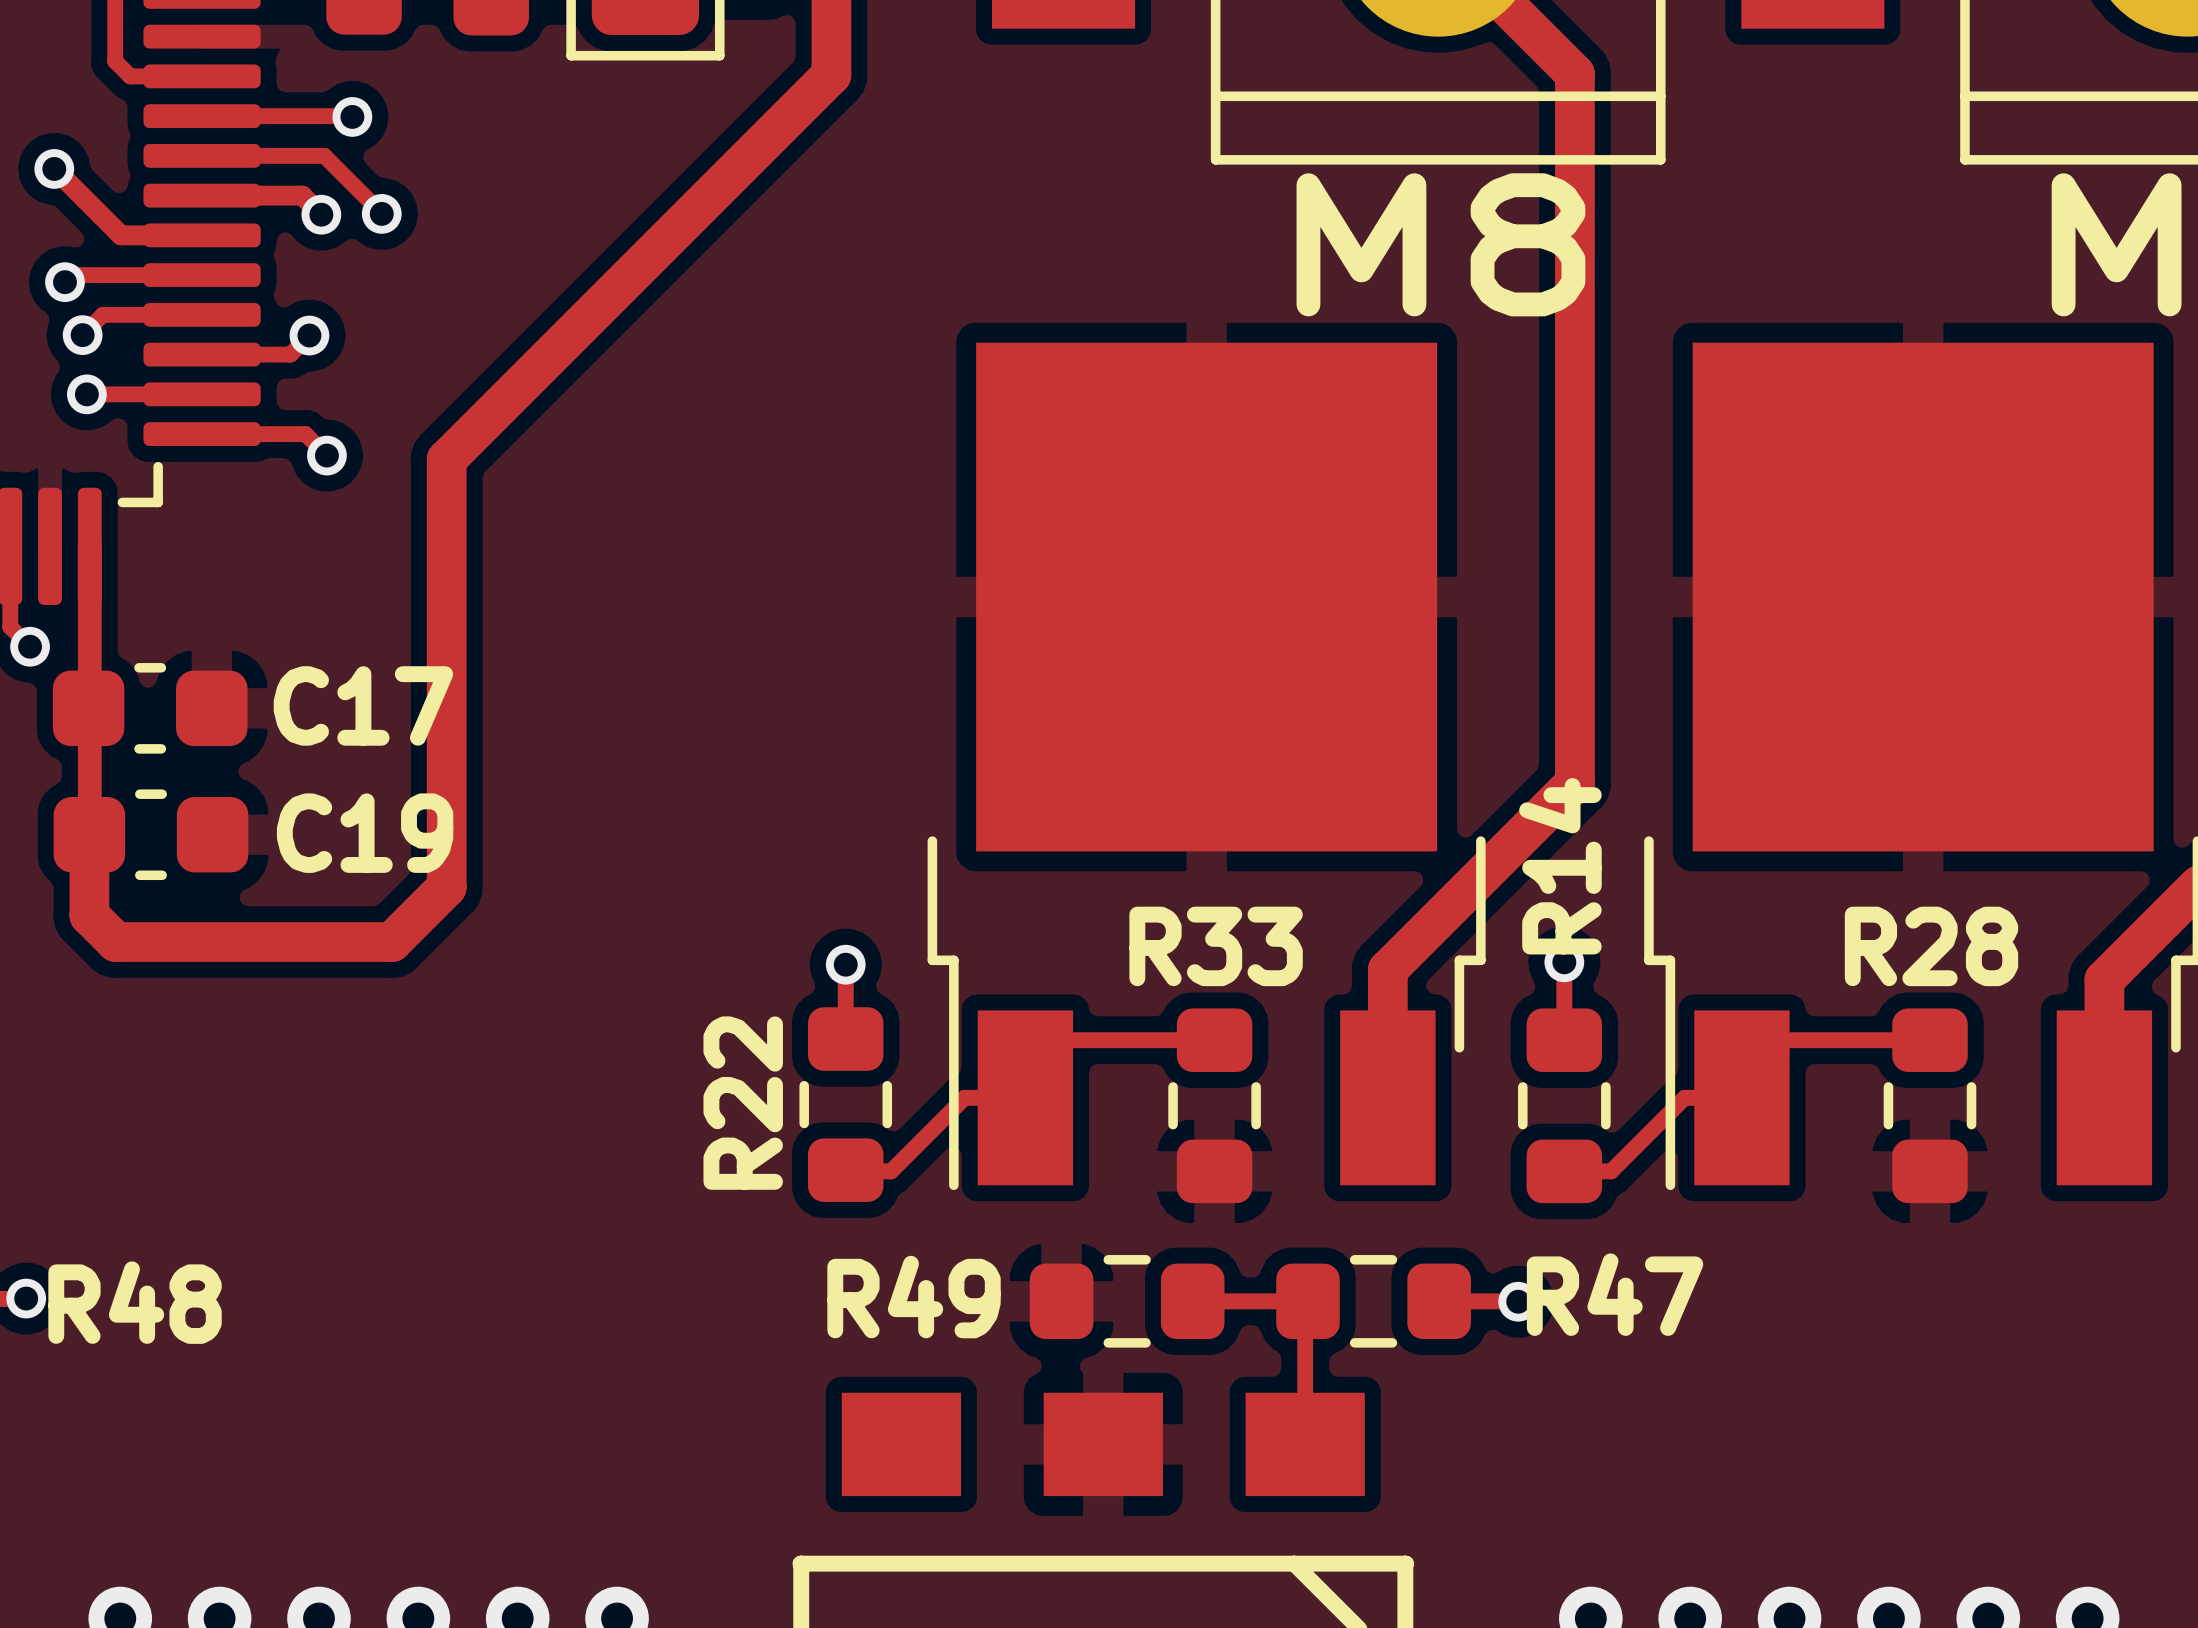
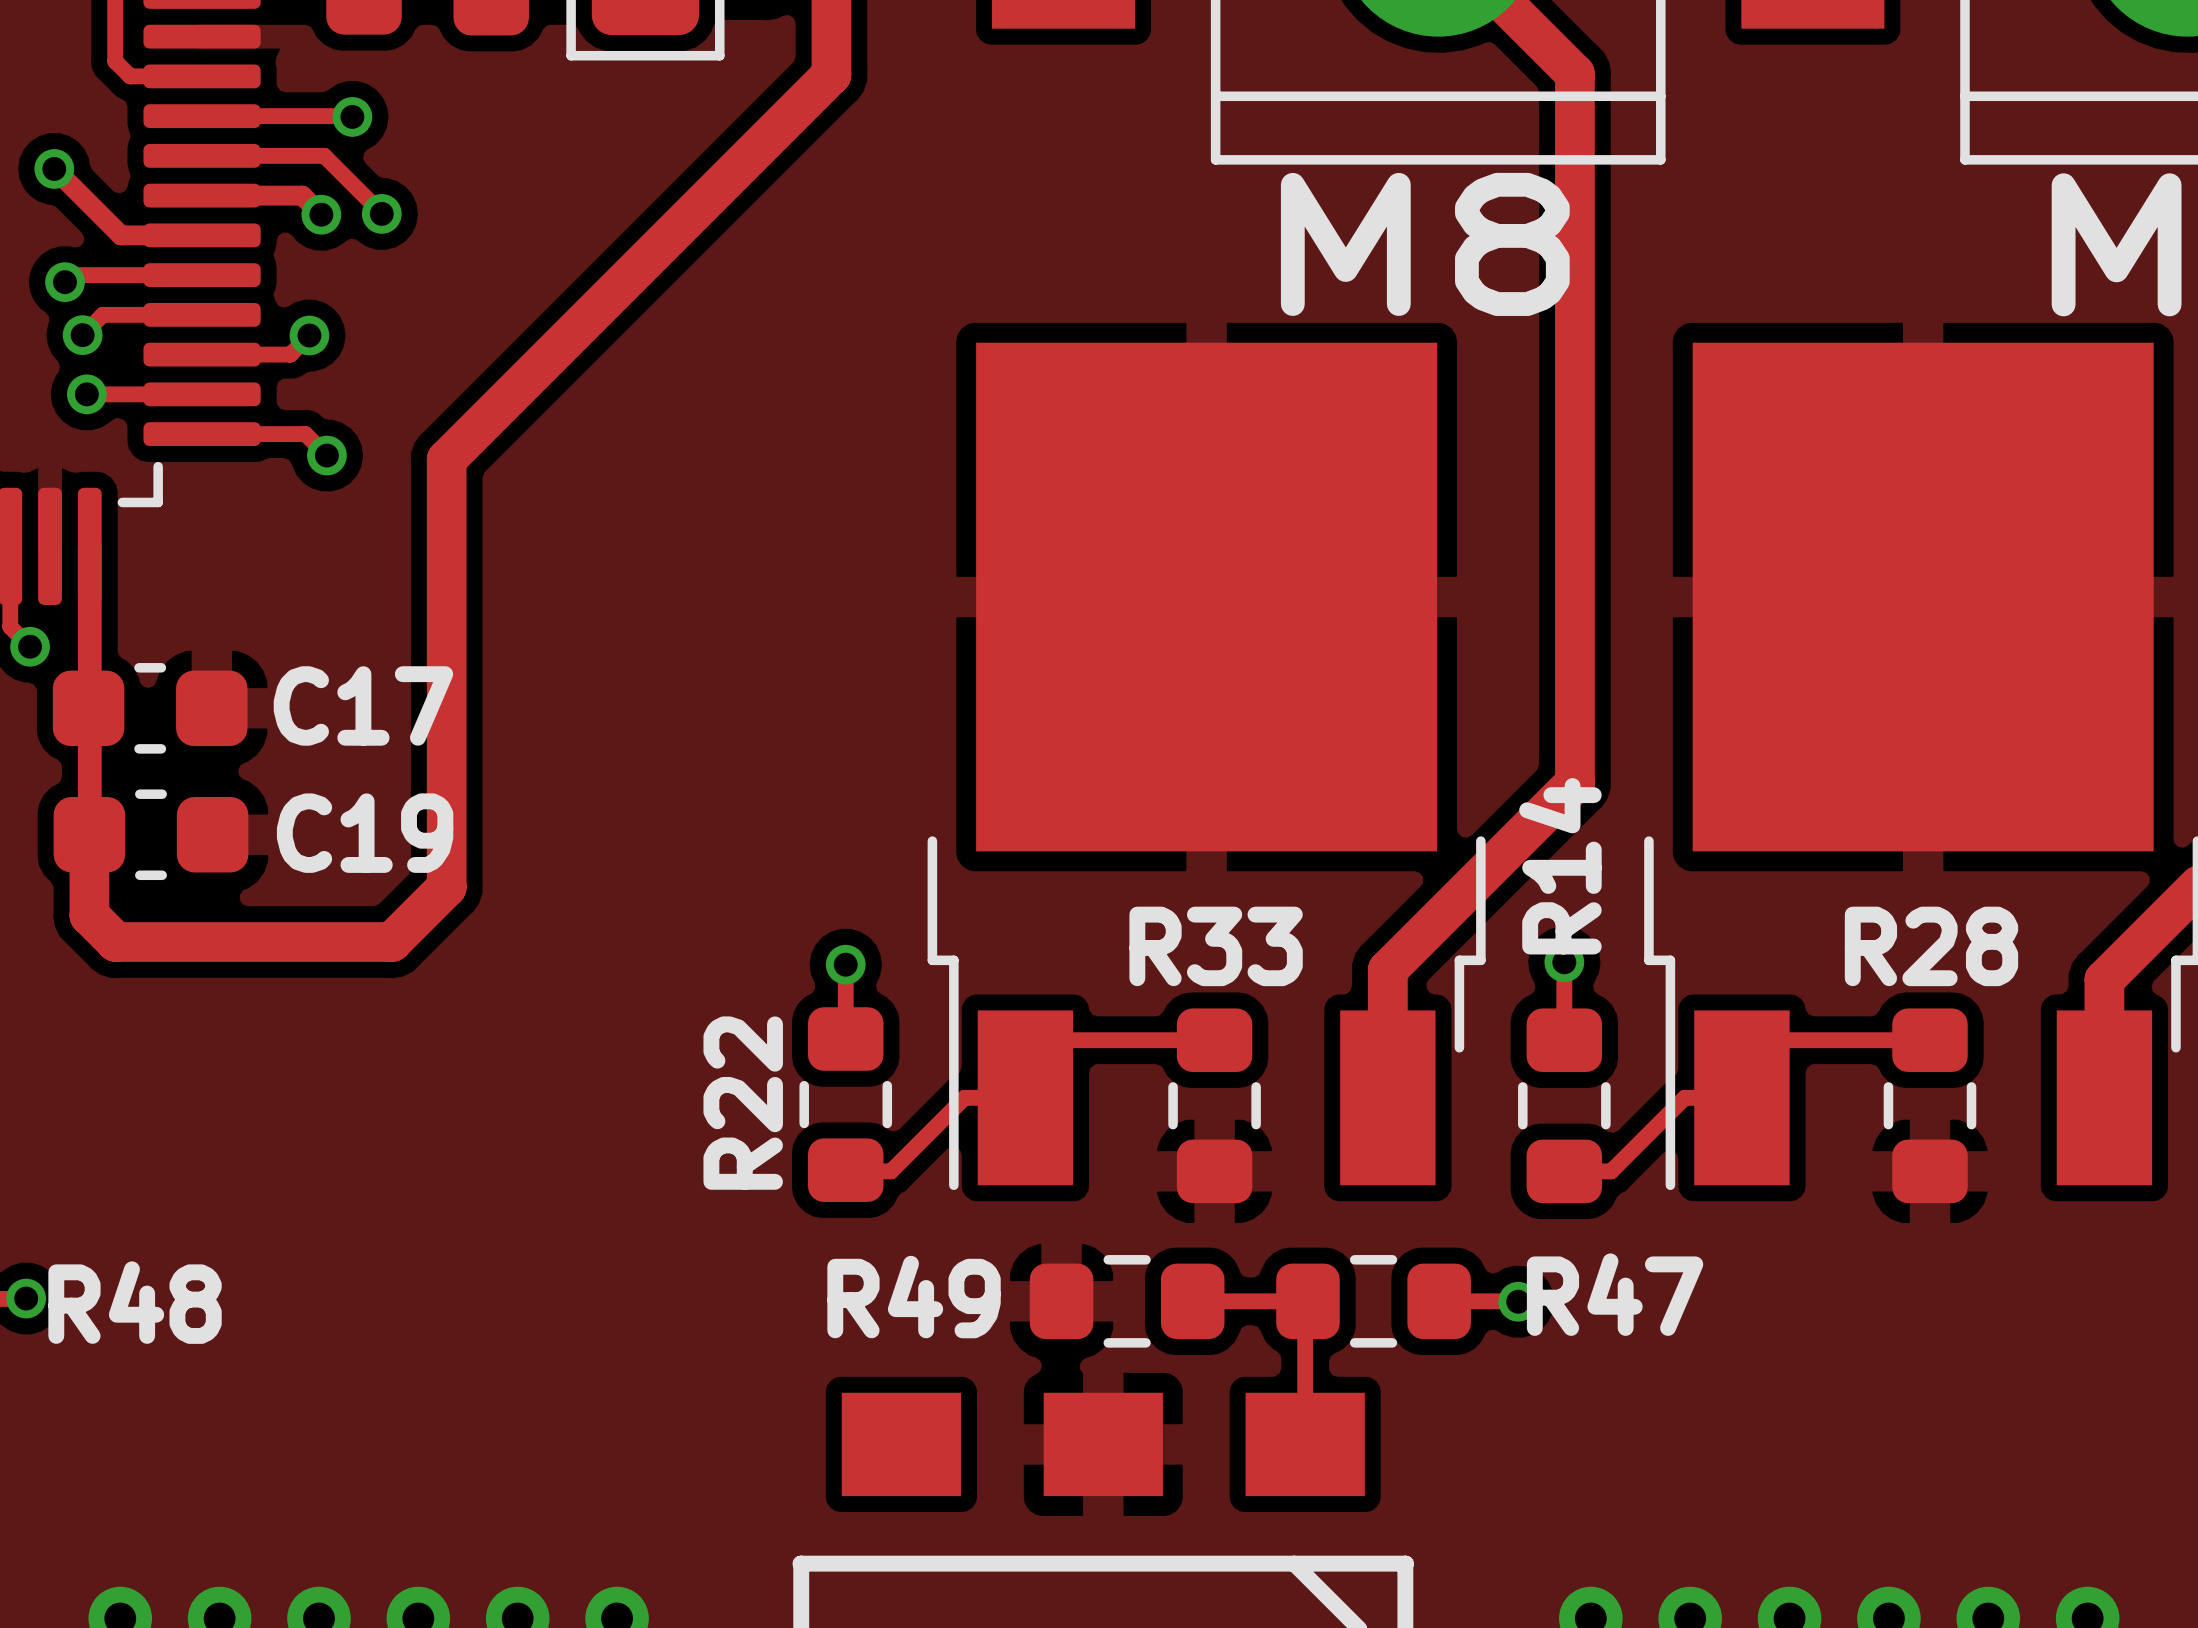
text position: M8 (1440, 244) -> M8 (1425, 244)

